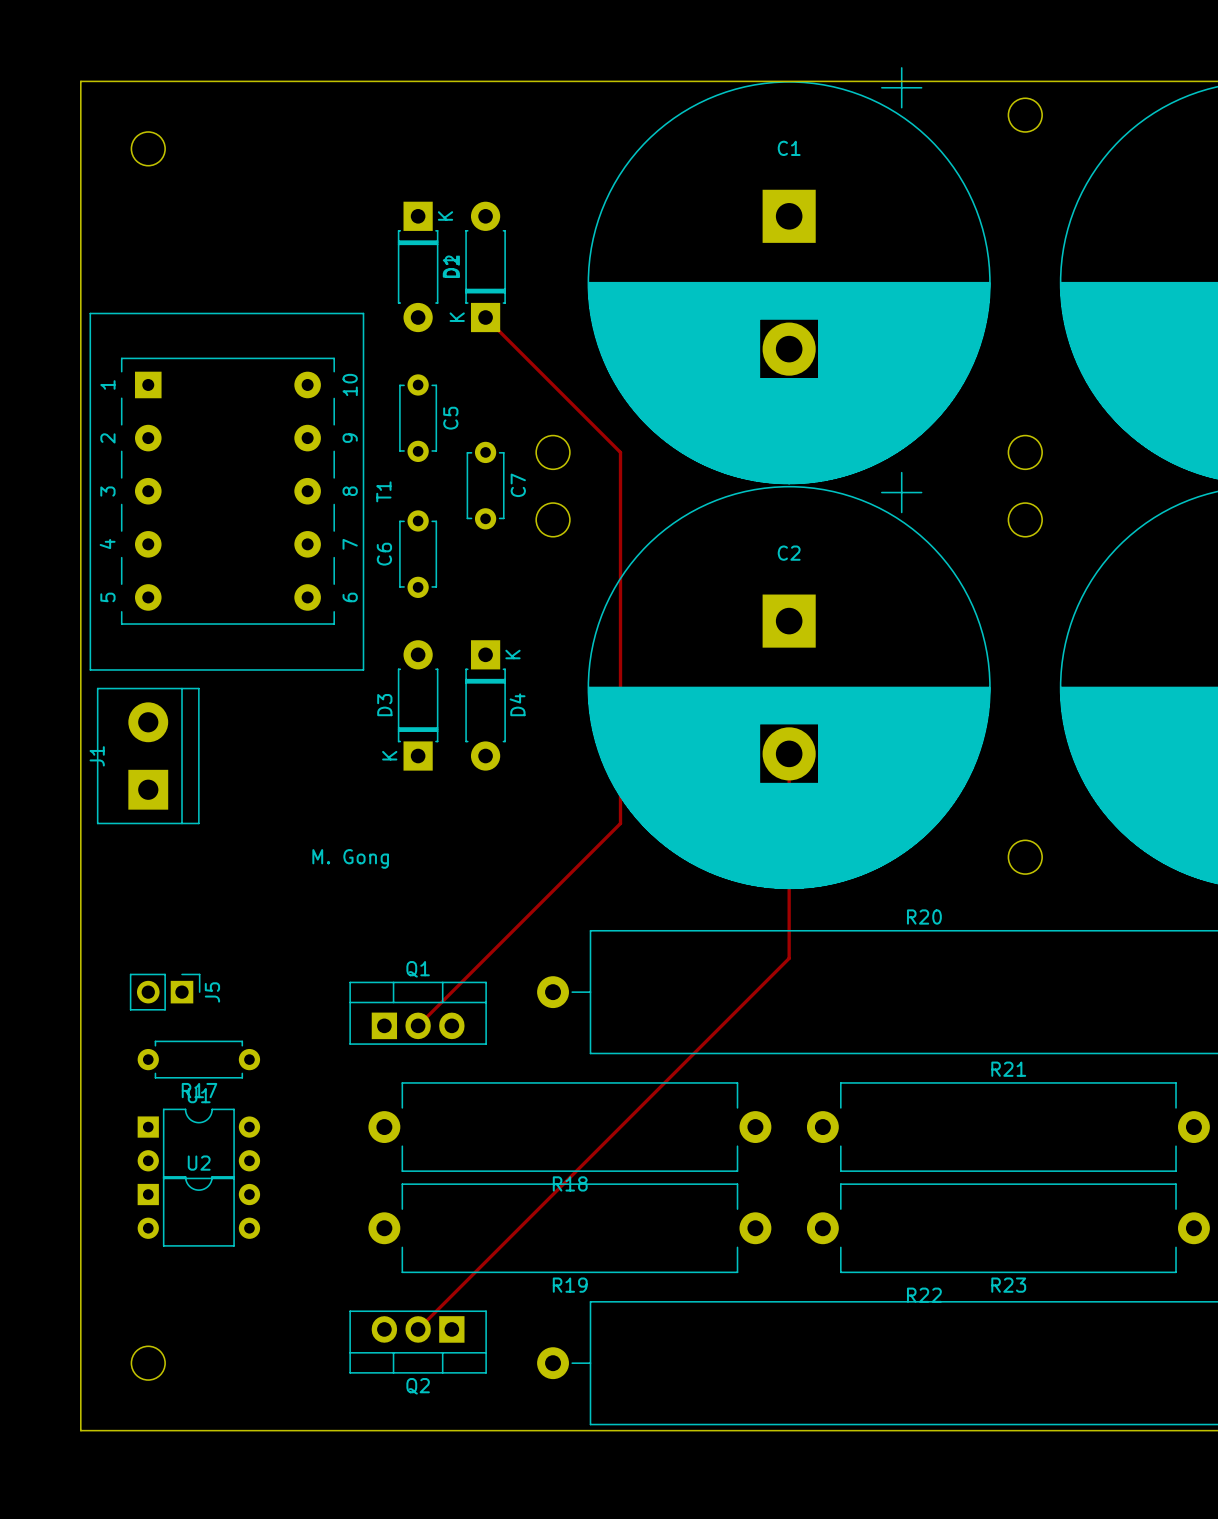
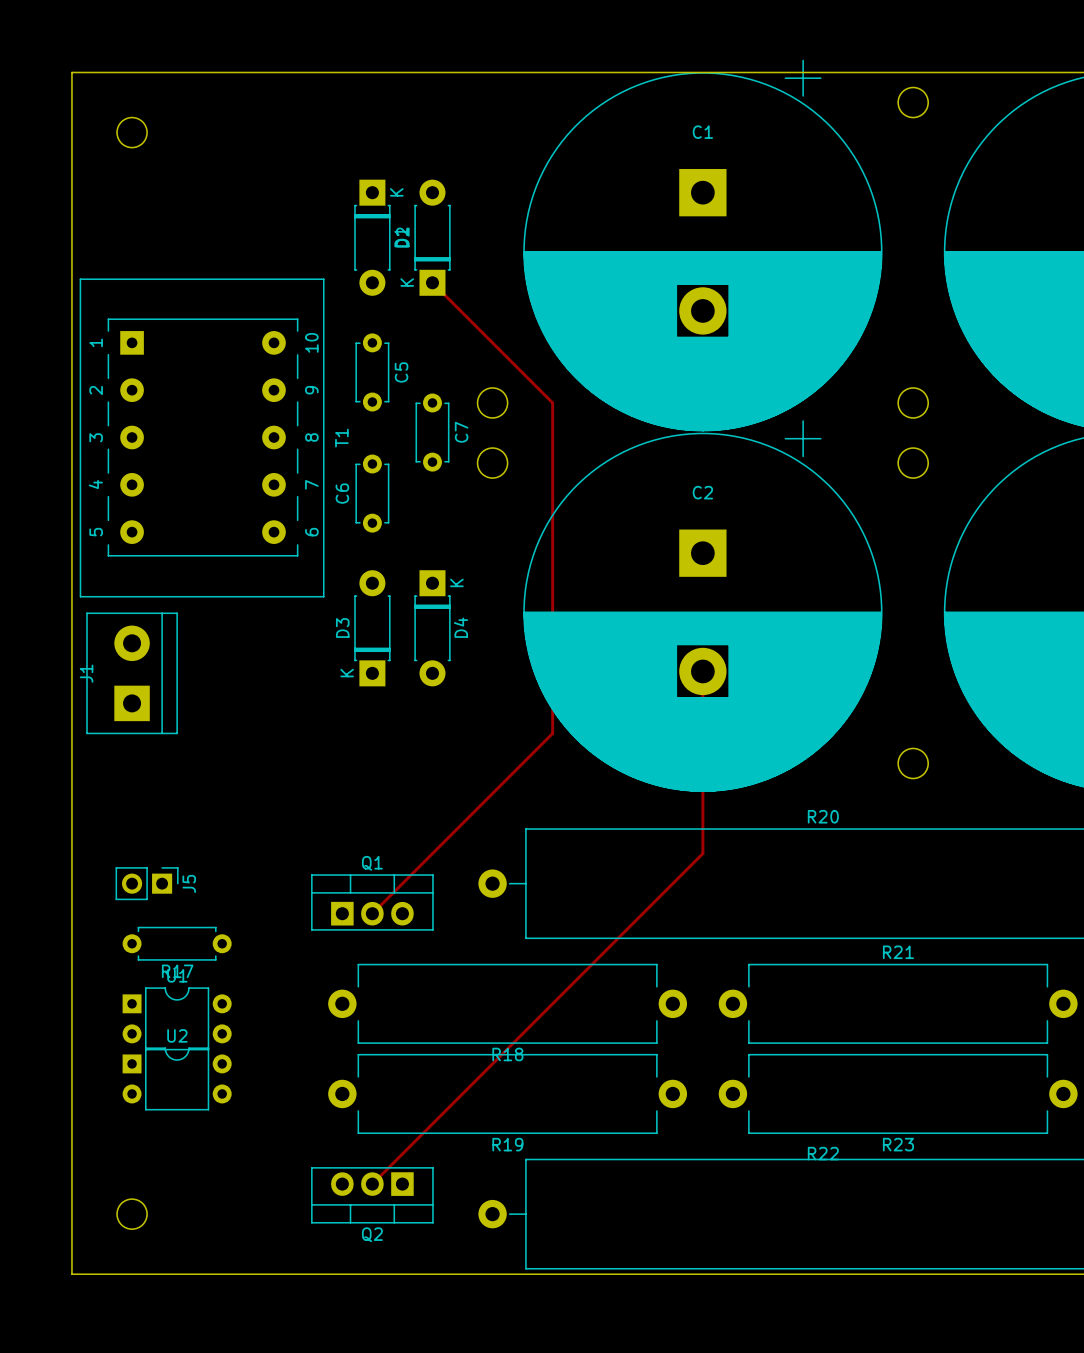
text: M. Gong (350, 858) -> none

